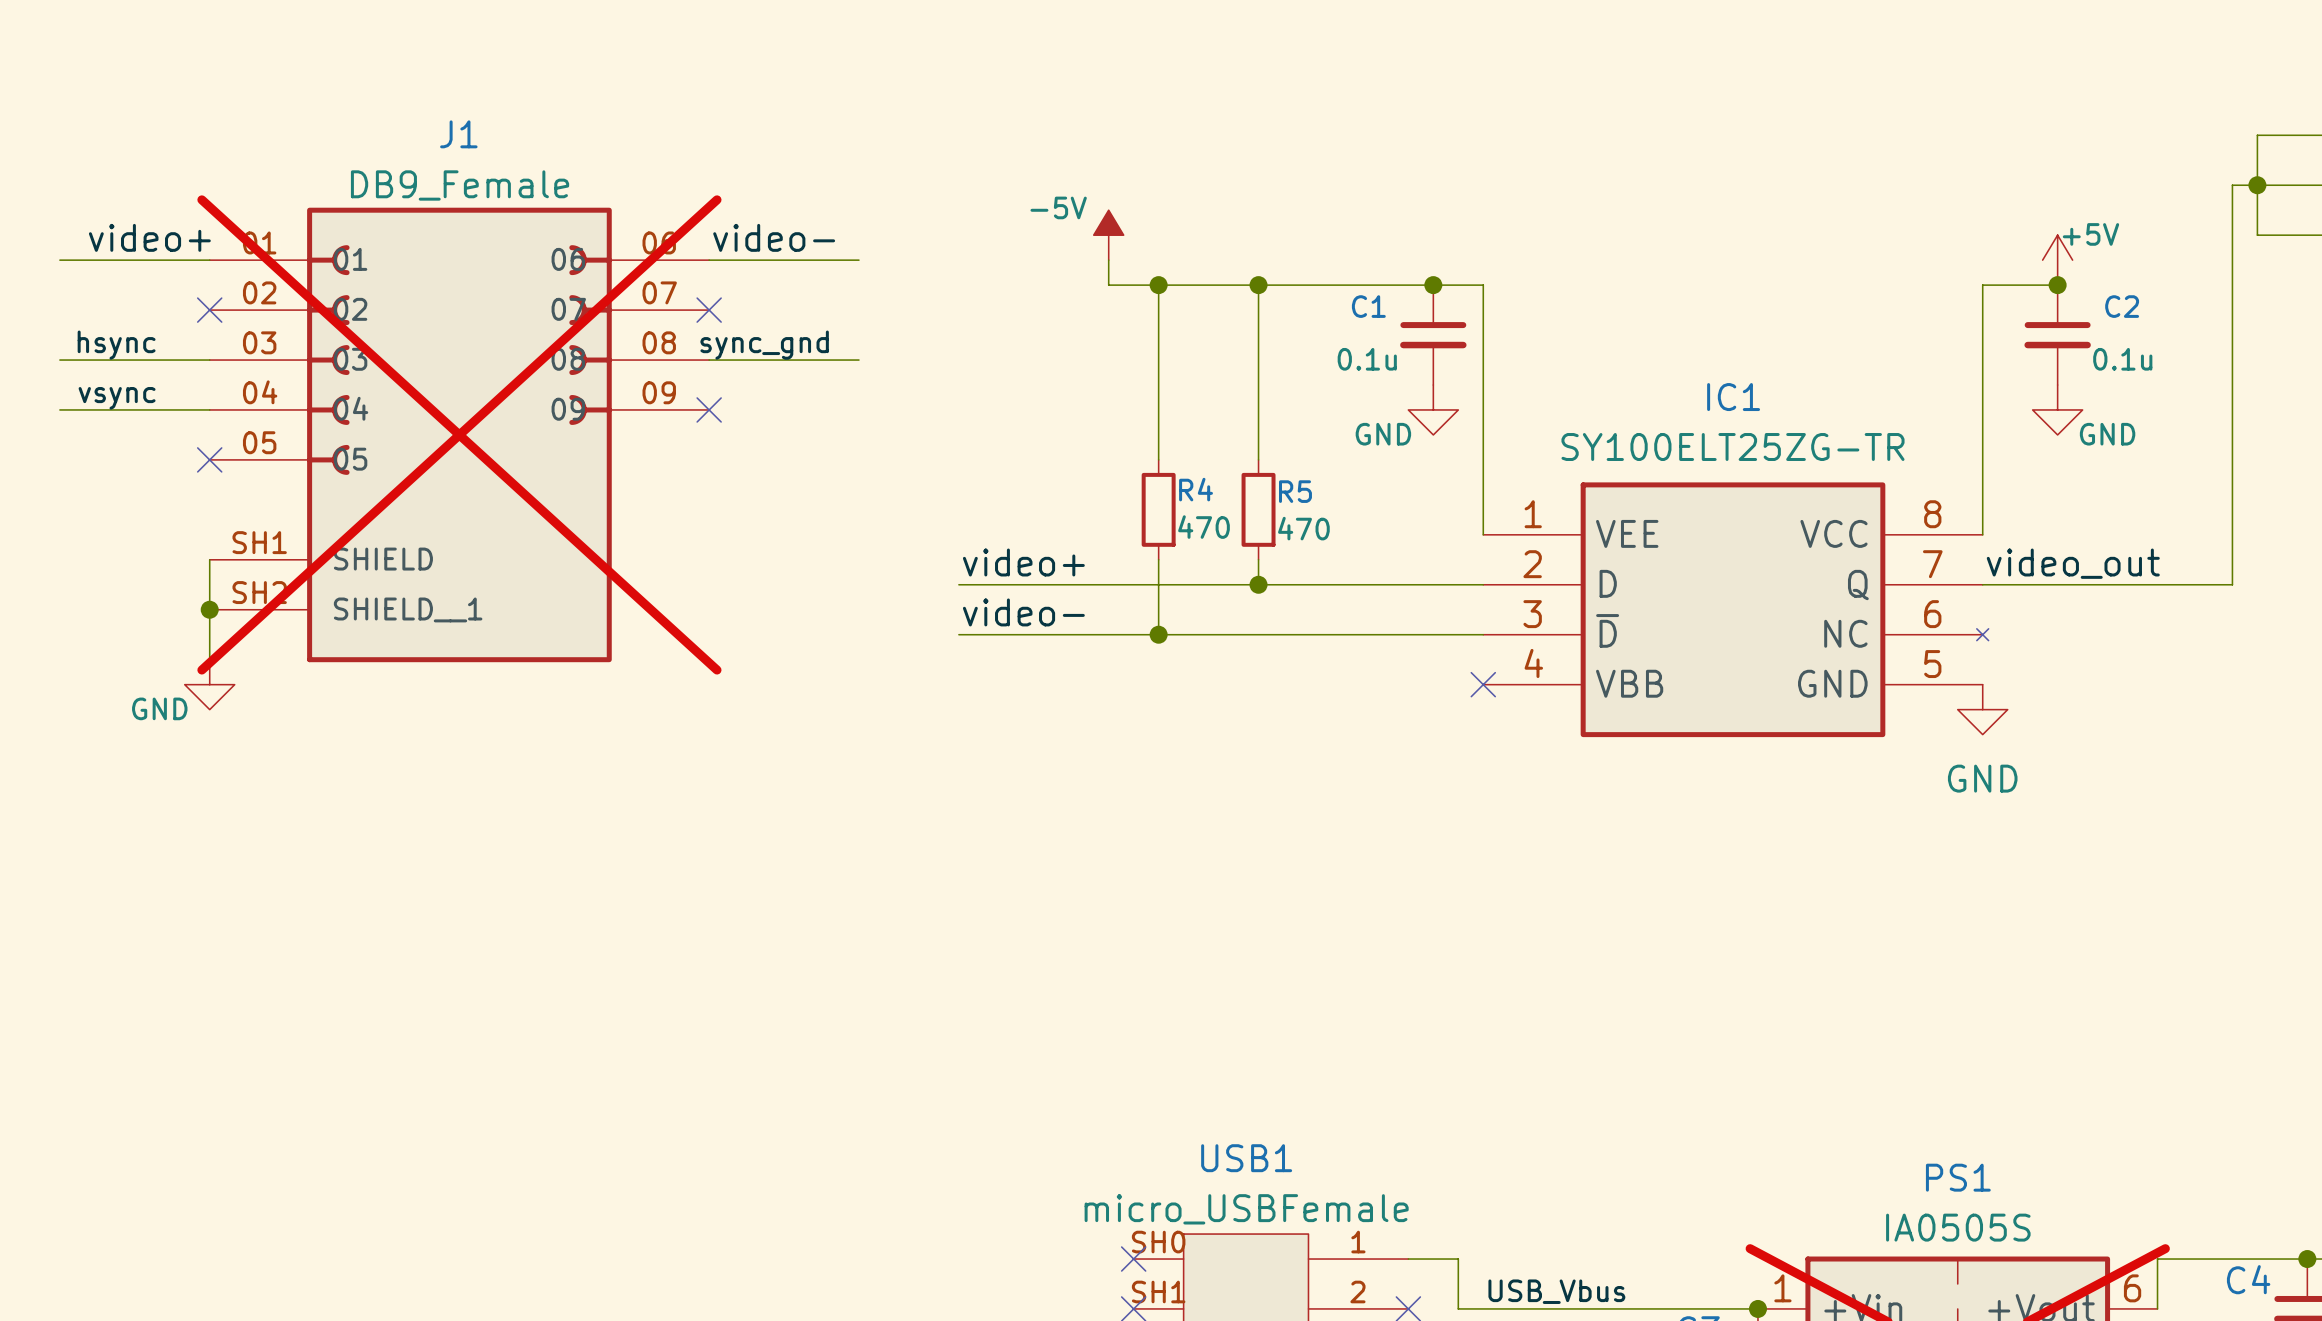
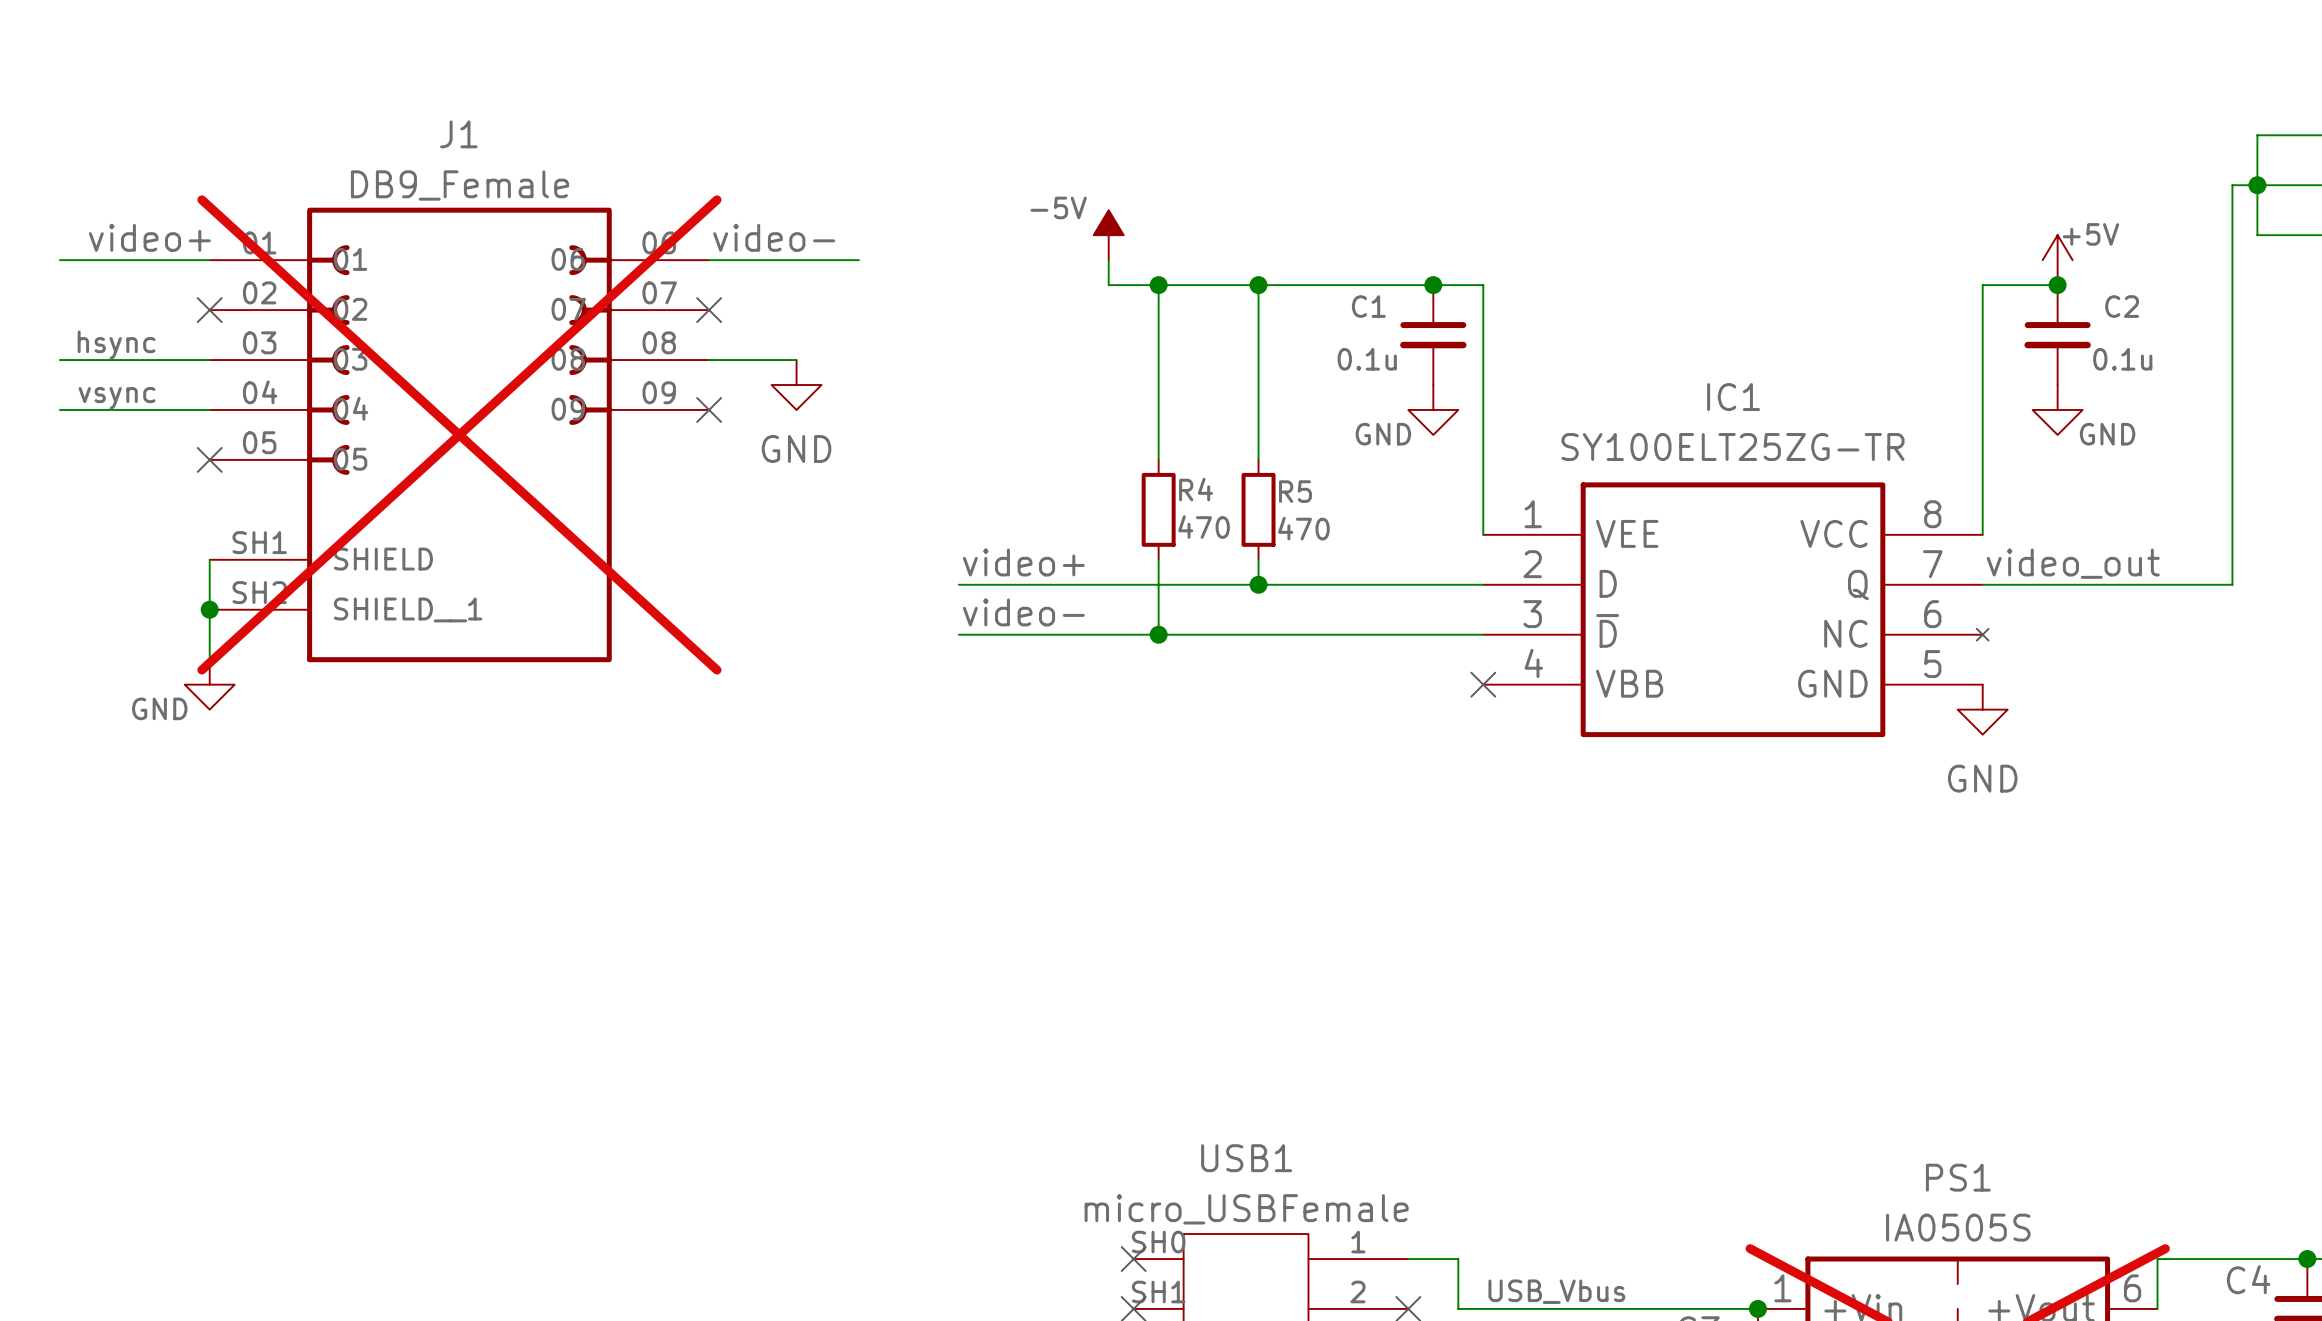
label: sync_gnd (764, 345) -> none
wire: (796, 360) (858, 360) -> none
power symbol: none -> GND (796, 385)

